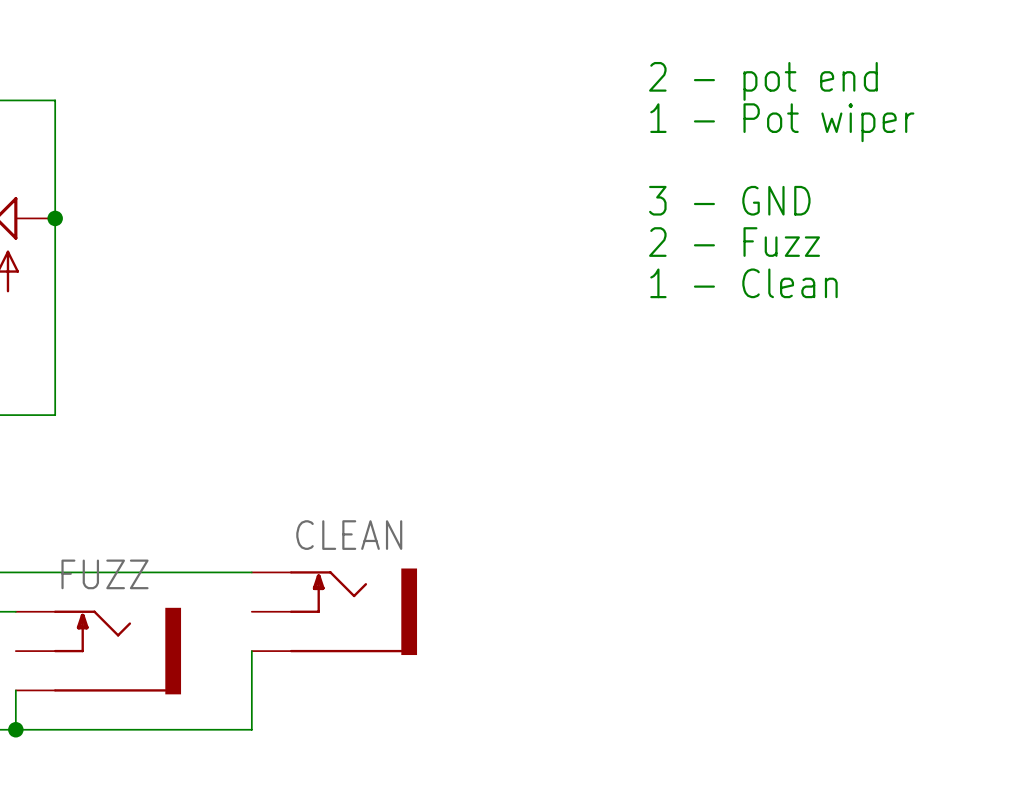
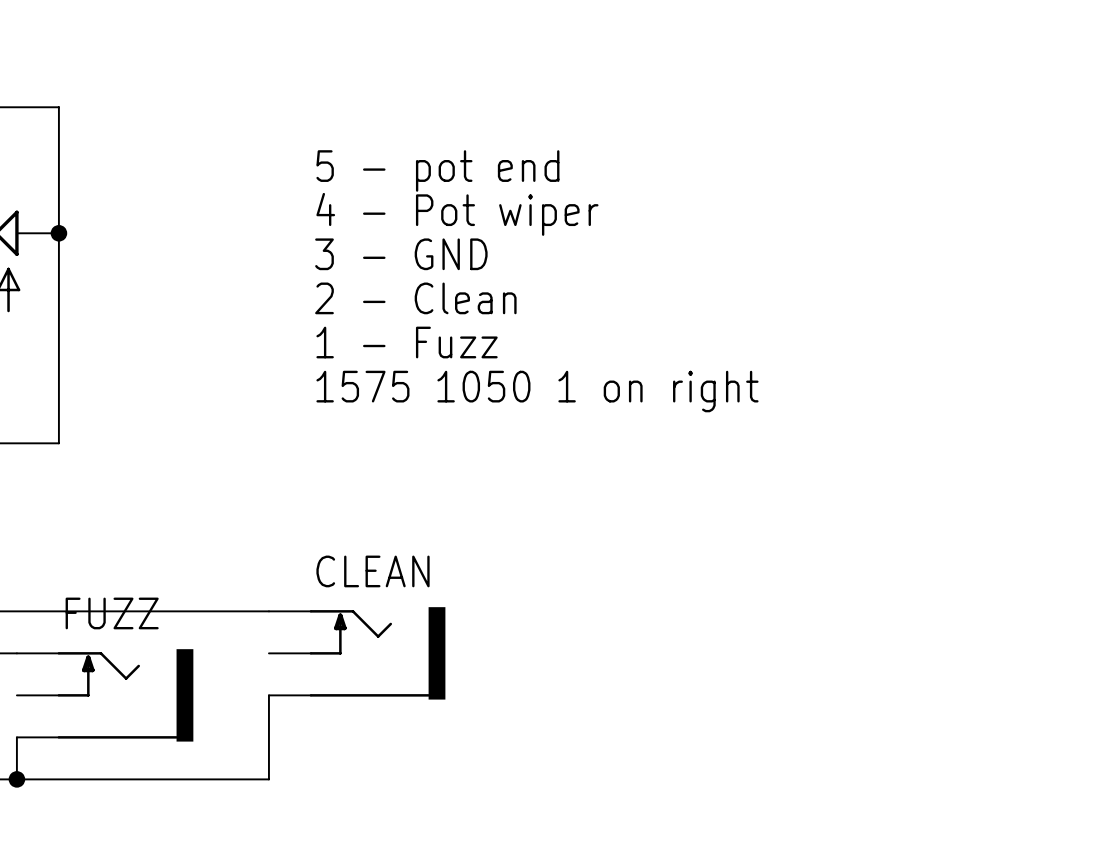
text: 2 - pot end (763, 81) -> none
text: 1 - Pot wiper (782, 122) -> none
text: none -> 5 - pot end (437, 170)
text: none -> 4 - Pot wiper (457, 214)
text position: 3 - GND (729, 200) -> 3 - GND (401, 254)
text: 2 - Fuzz (734, 242) -> none
text: none -> 2 - Clean (415, 298)
text: 1 - Clean (743, 283) -> none
text: none -> 1 - Fuzz (407, 342)
text: none -> 1575 1050 1 on right (537, 391)

